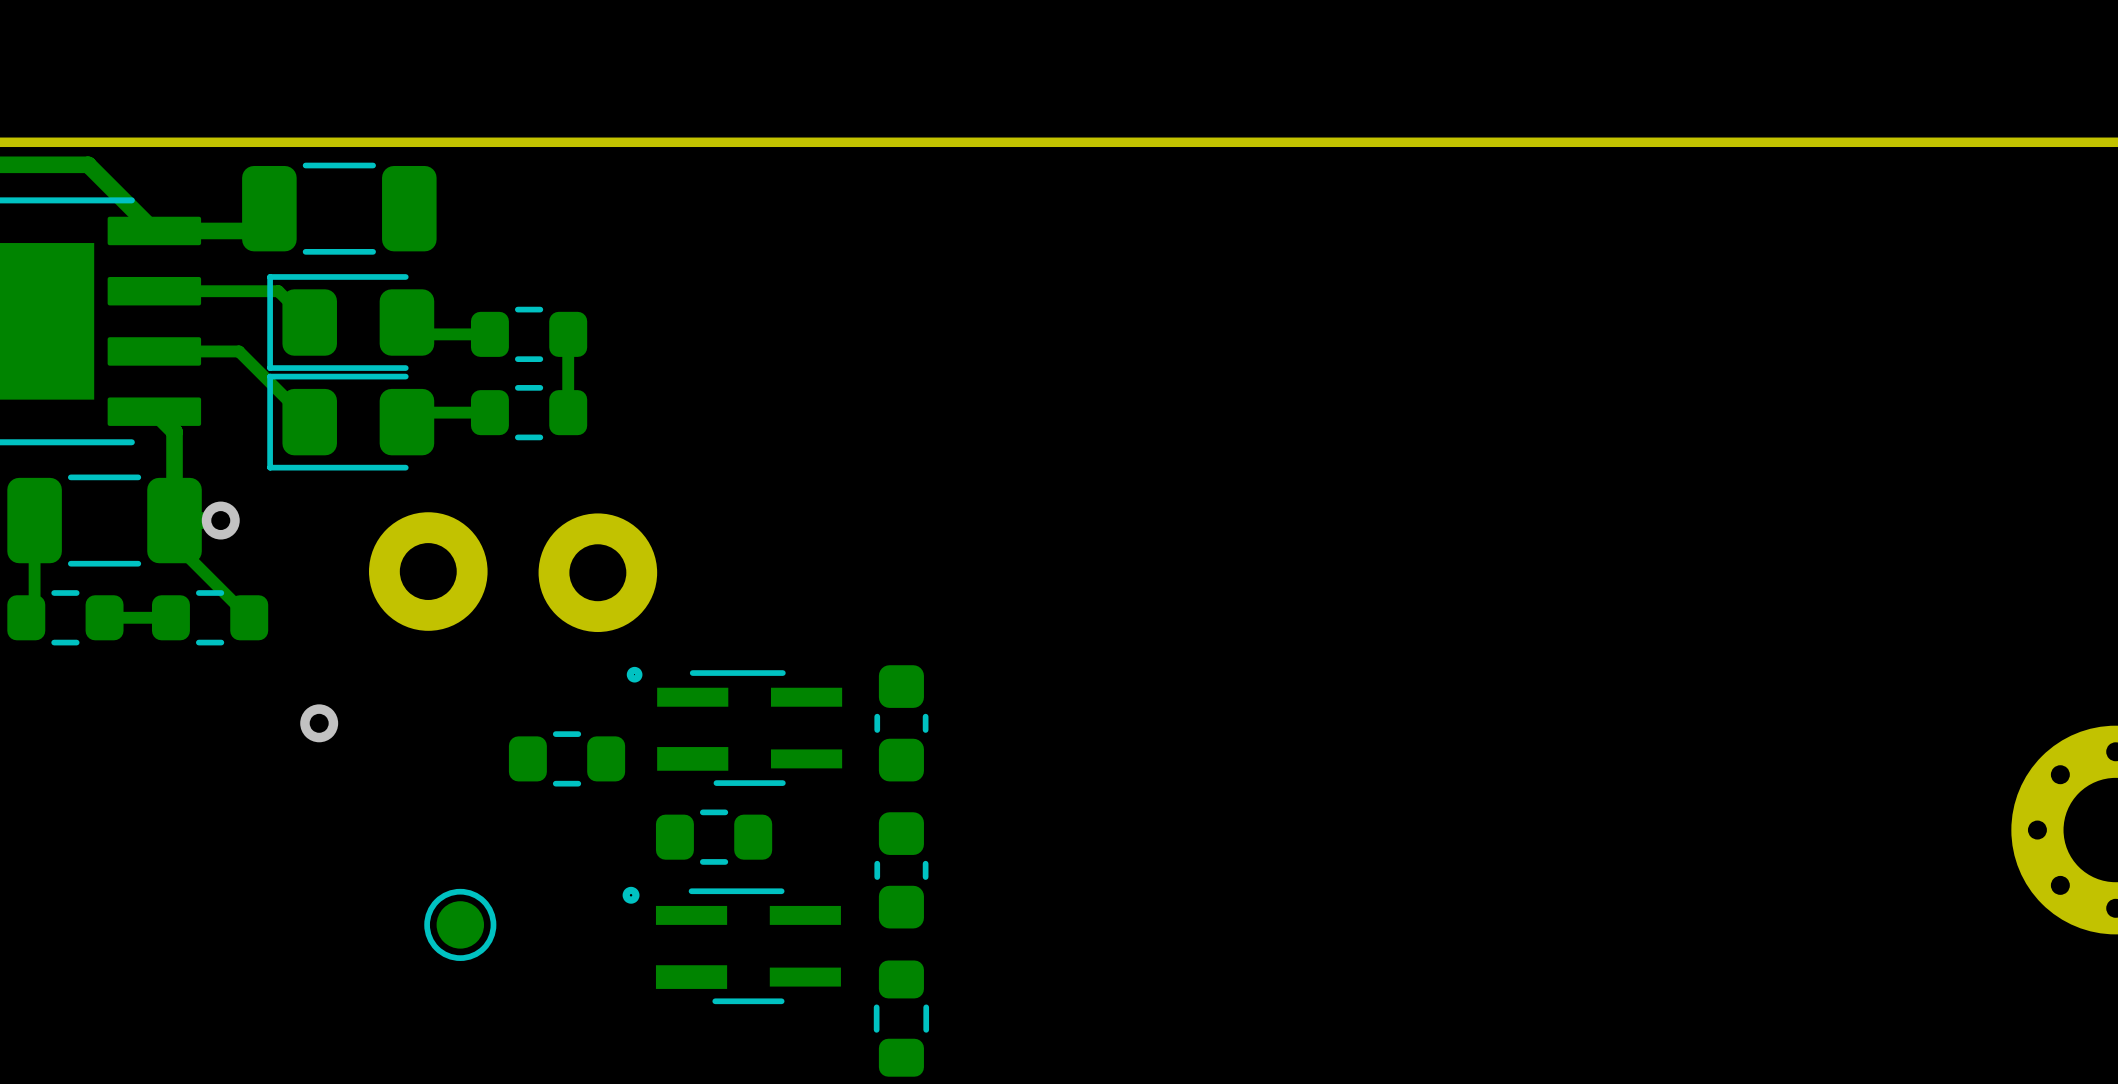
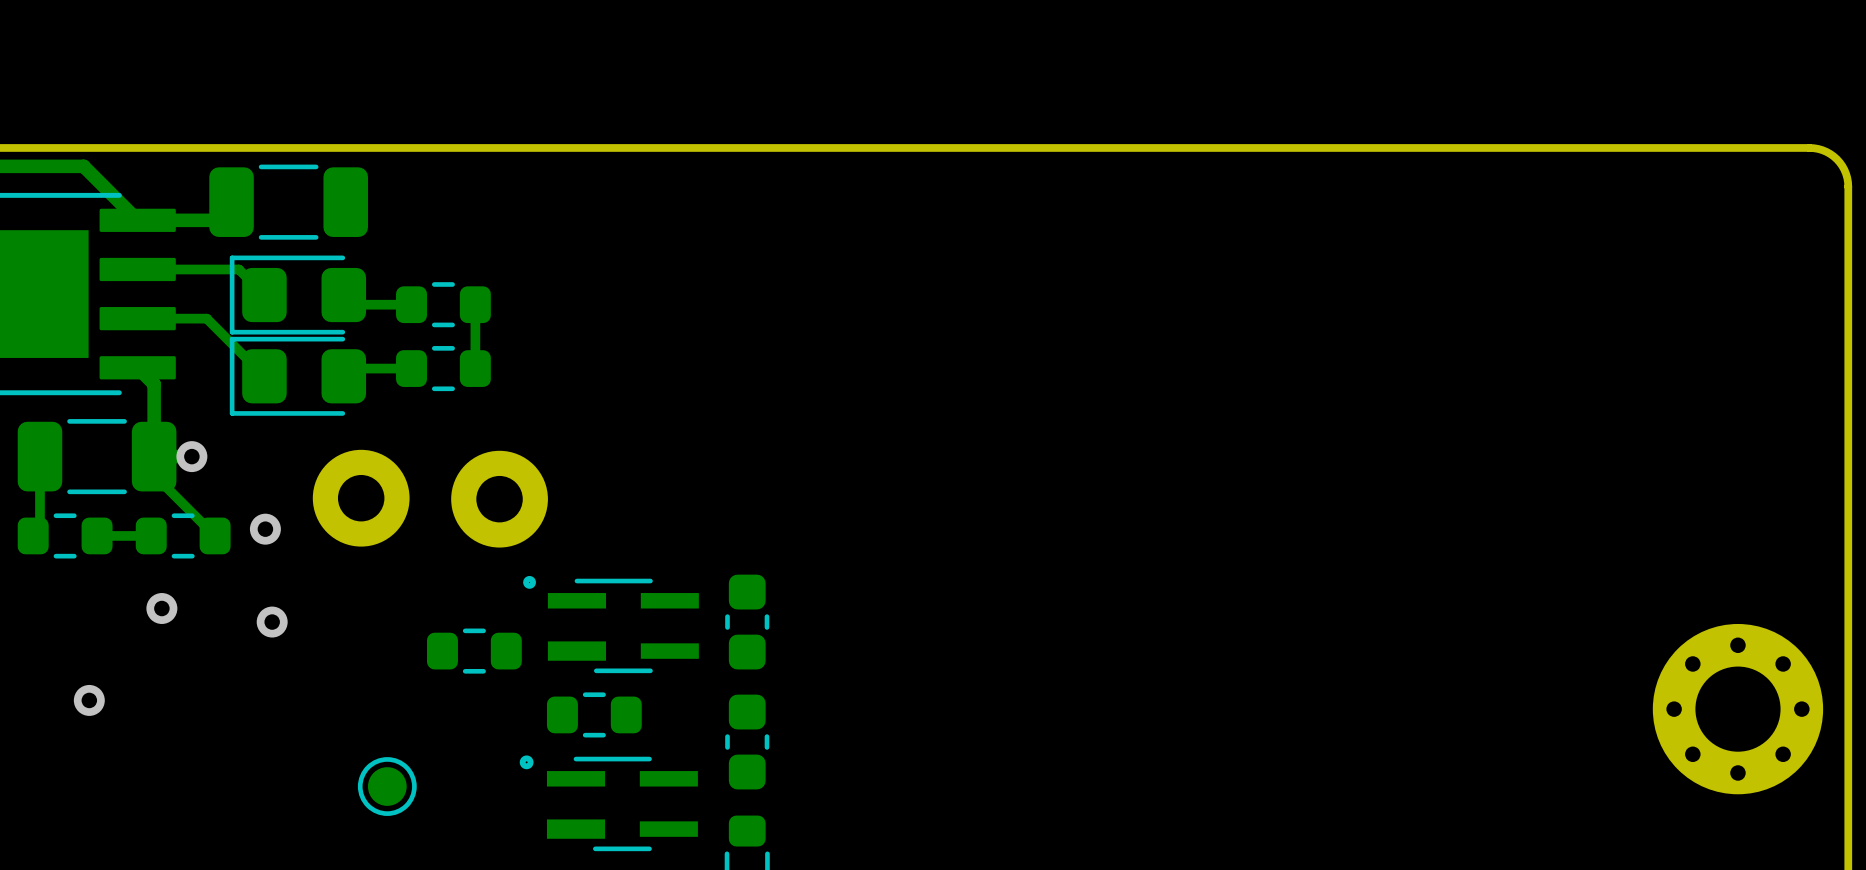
via: none -> (265, 529)
via: none -> (161, 608)
via: none -> (89, 700)

